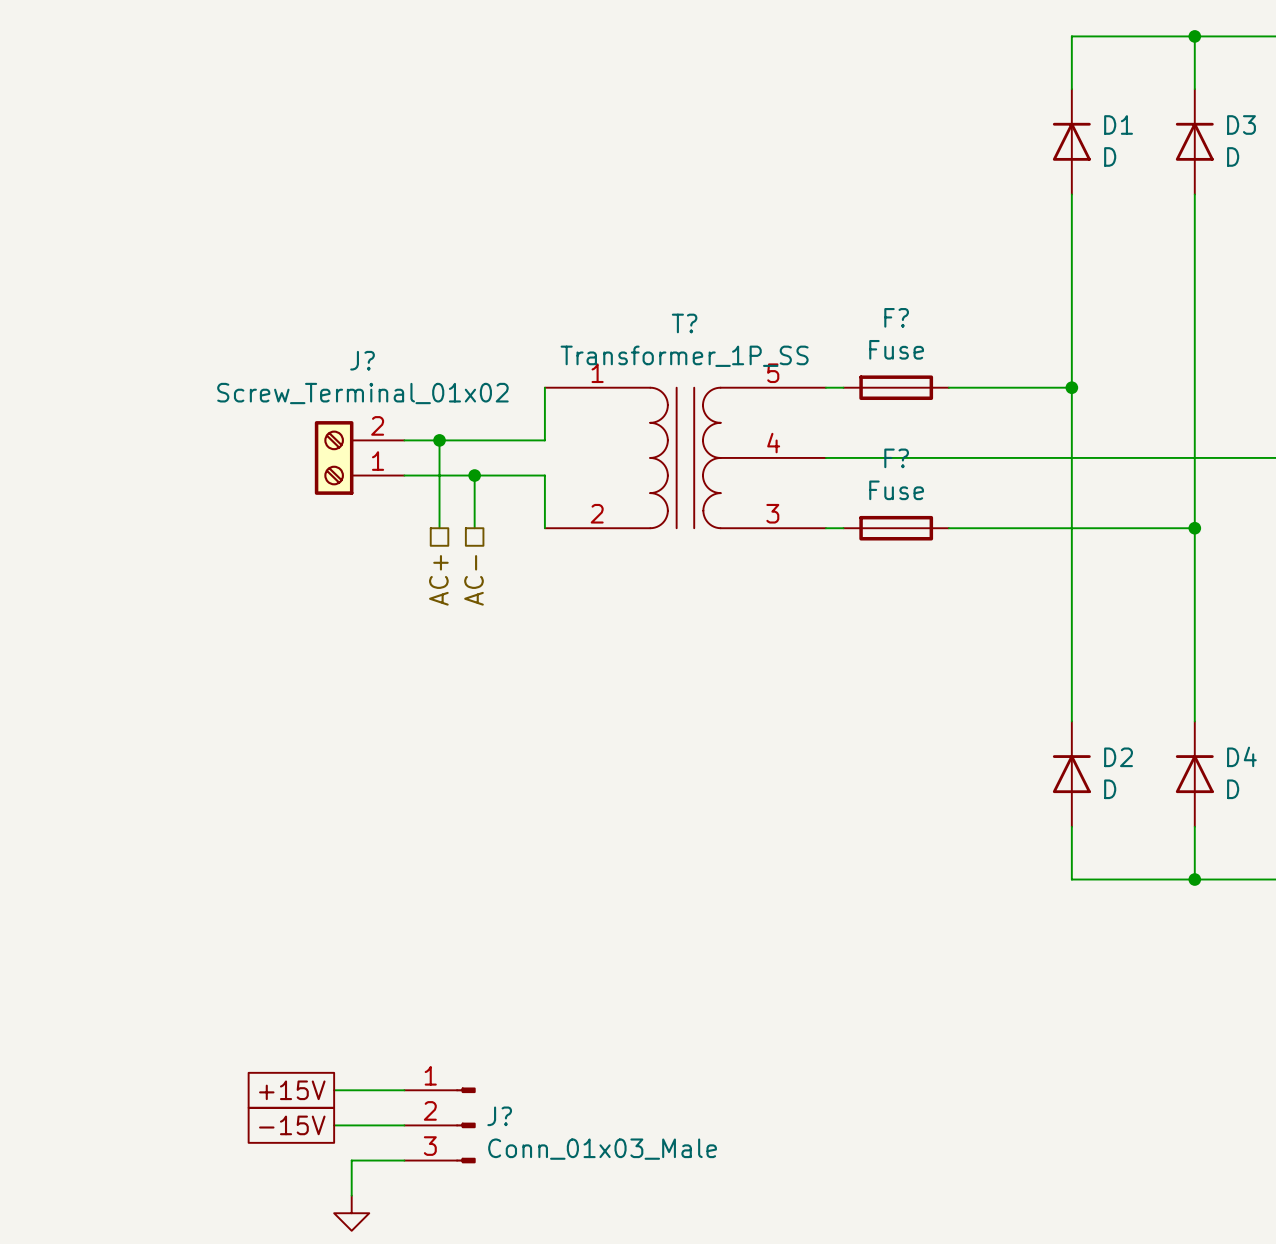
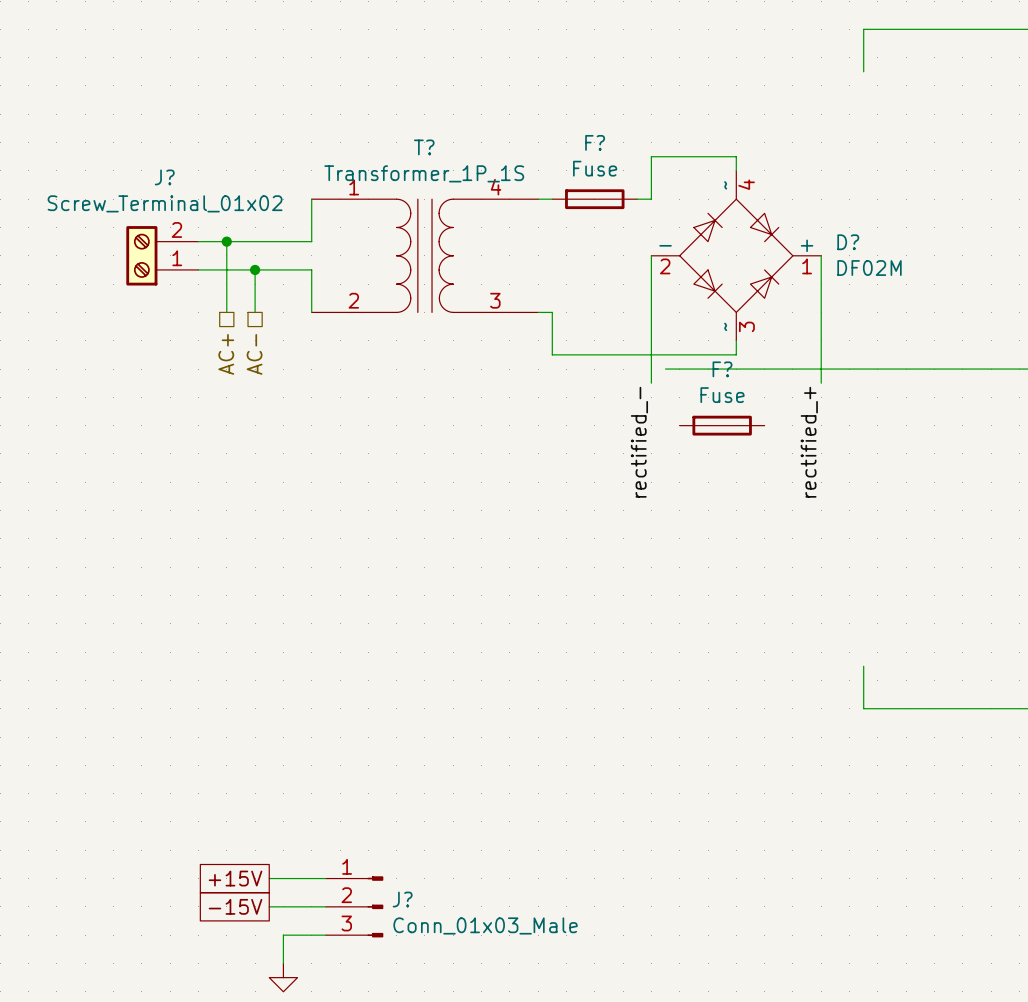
wire: (1194, 36) (1194, 89) -> none
junction: (1194, 36) -> none
D1: D (1071, 141) -> none
D3: D (1194, 141) -> none
wire: (1071, 194) (1071, 721) -> none
wire: (1194, 194) (1194, 721) -> none
wire: none -> (736, 170) (736, 156) (651, 156) (651, 199) (637, 199)
junction: none -> (226, 241)
T?: none -> Transformer_1P_1S (424, 255)
wire: none -> (651, 255) (651, 383)
D?: none -> DF02M (736, 255)
wire: none -> (821, 255) (821, 383)
junction: none -> (255, 269)
wire: (544, 387) (544, 440) (404, 440) -> (311, 199) (311, 241) (198, 241)
wire: none -> (538, 312) (552, 312) (552, 354) (736, 354) (736, 340)
wire: (825, 387) (843, 387) -> (538, 199) (552, 199)
F? position: (896, 387) -> (594, 199)
wire: (948, 387) (1071, 387) -> none
junction: (1071, 387) -> none
wire: (439, 440) (439, 528) -> (226, 241) (226, 312)
junction: (439, 440) -> none
J? position: (359, 457) -> (162, 255)
T?: Transformer_1P_SS (685, 457) -> none
wire: (404, 475) (544, 475) (544, 528) -> (198, 269) (311, 269) (311, 312)
wire: (474, 475) (474, 528) -> (255, 269) (255, 312)
junction: (474, 475) -> none
wire: (825, 528) (843, 528) -> none
wire: (948, 528) (1194, 528) -> none
junction: (1194, 528) -> none
label: none -> rectified_- (639, 442)
label: none -> rectified_+ (809, 442)
hierarchical label position: AC+ (438, 580) -> AC+ (226, 354)
hierarchical label position: AC- (473, 580) -> AC- (254, 354)
D2: D (1071, 774) -> none
D4: D (1194, 774) -> none
wire: (1194, 826) (1194, 879) -> none
junction: (1194, 879) -> none

